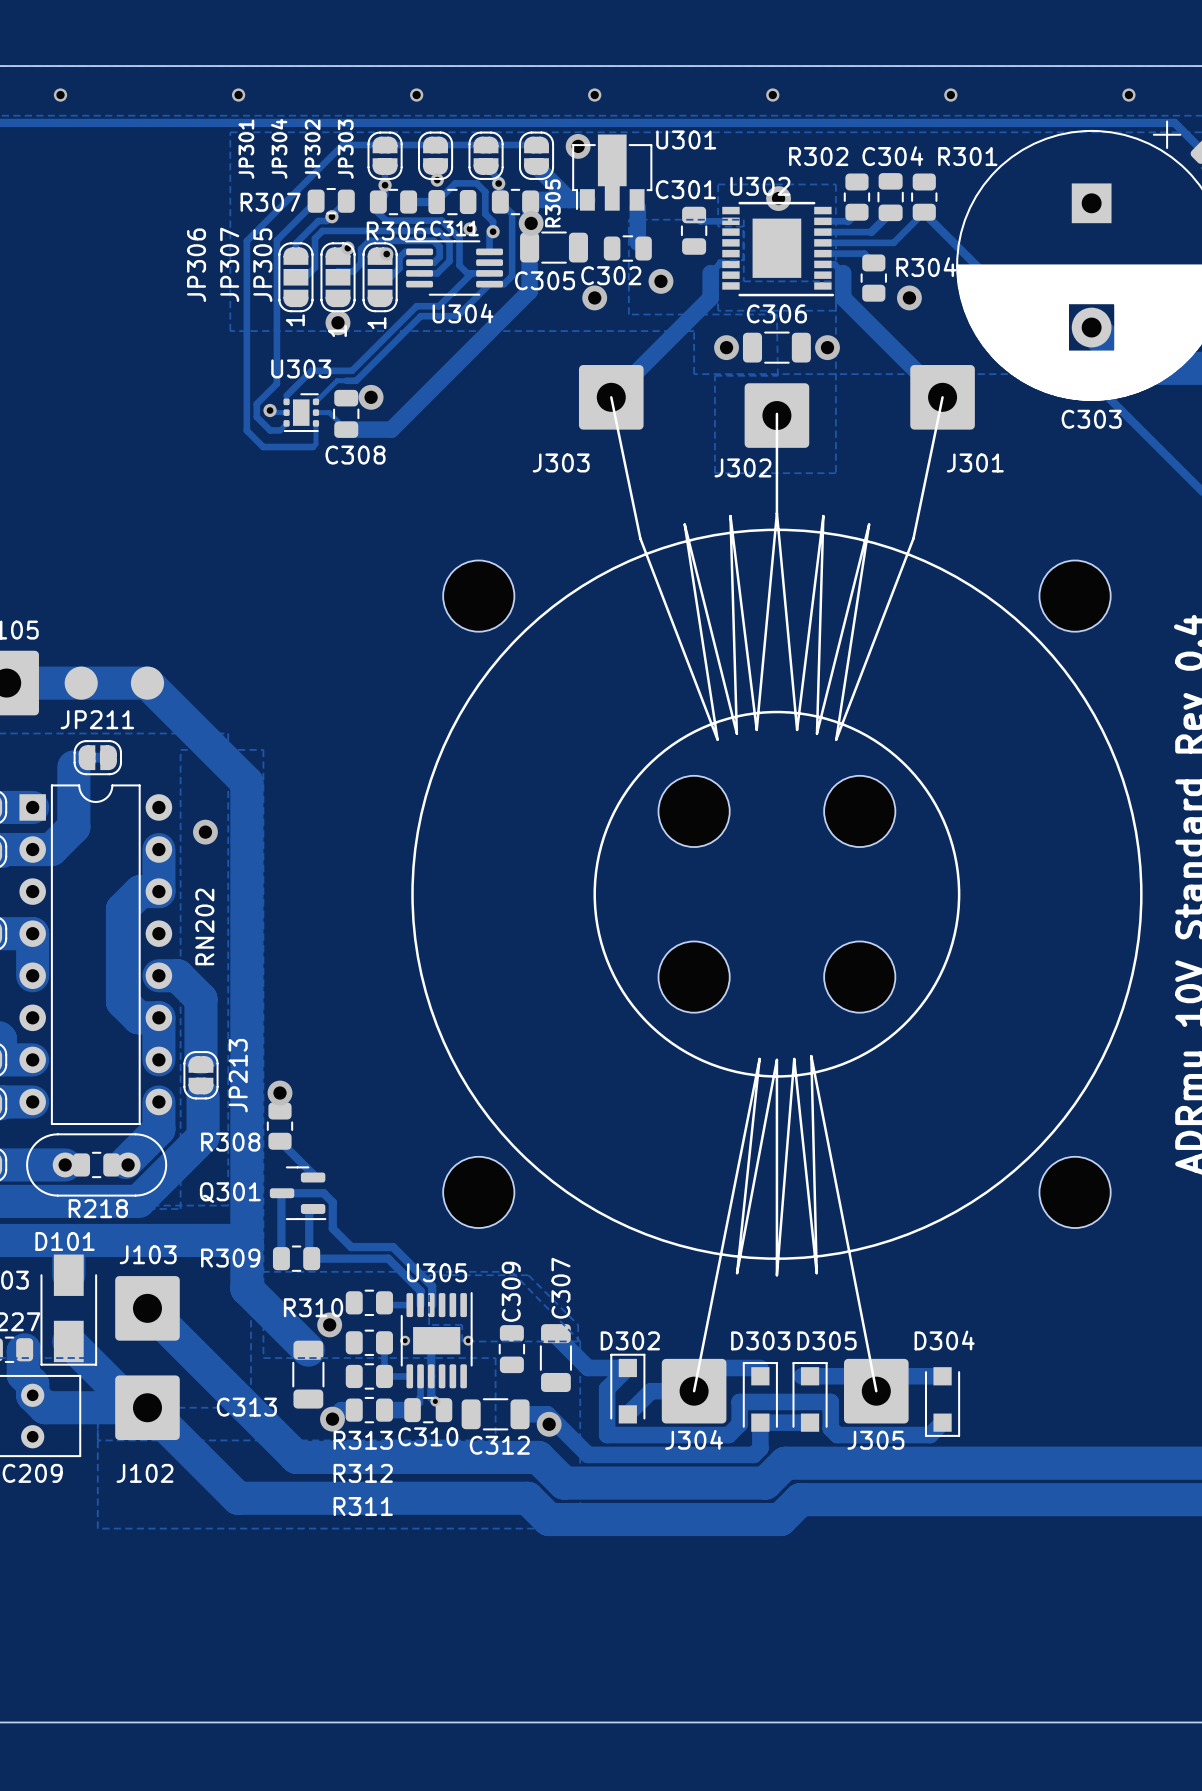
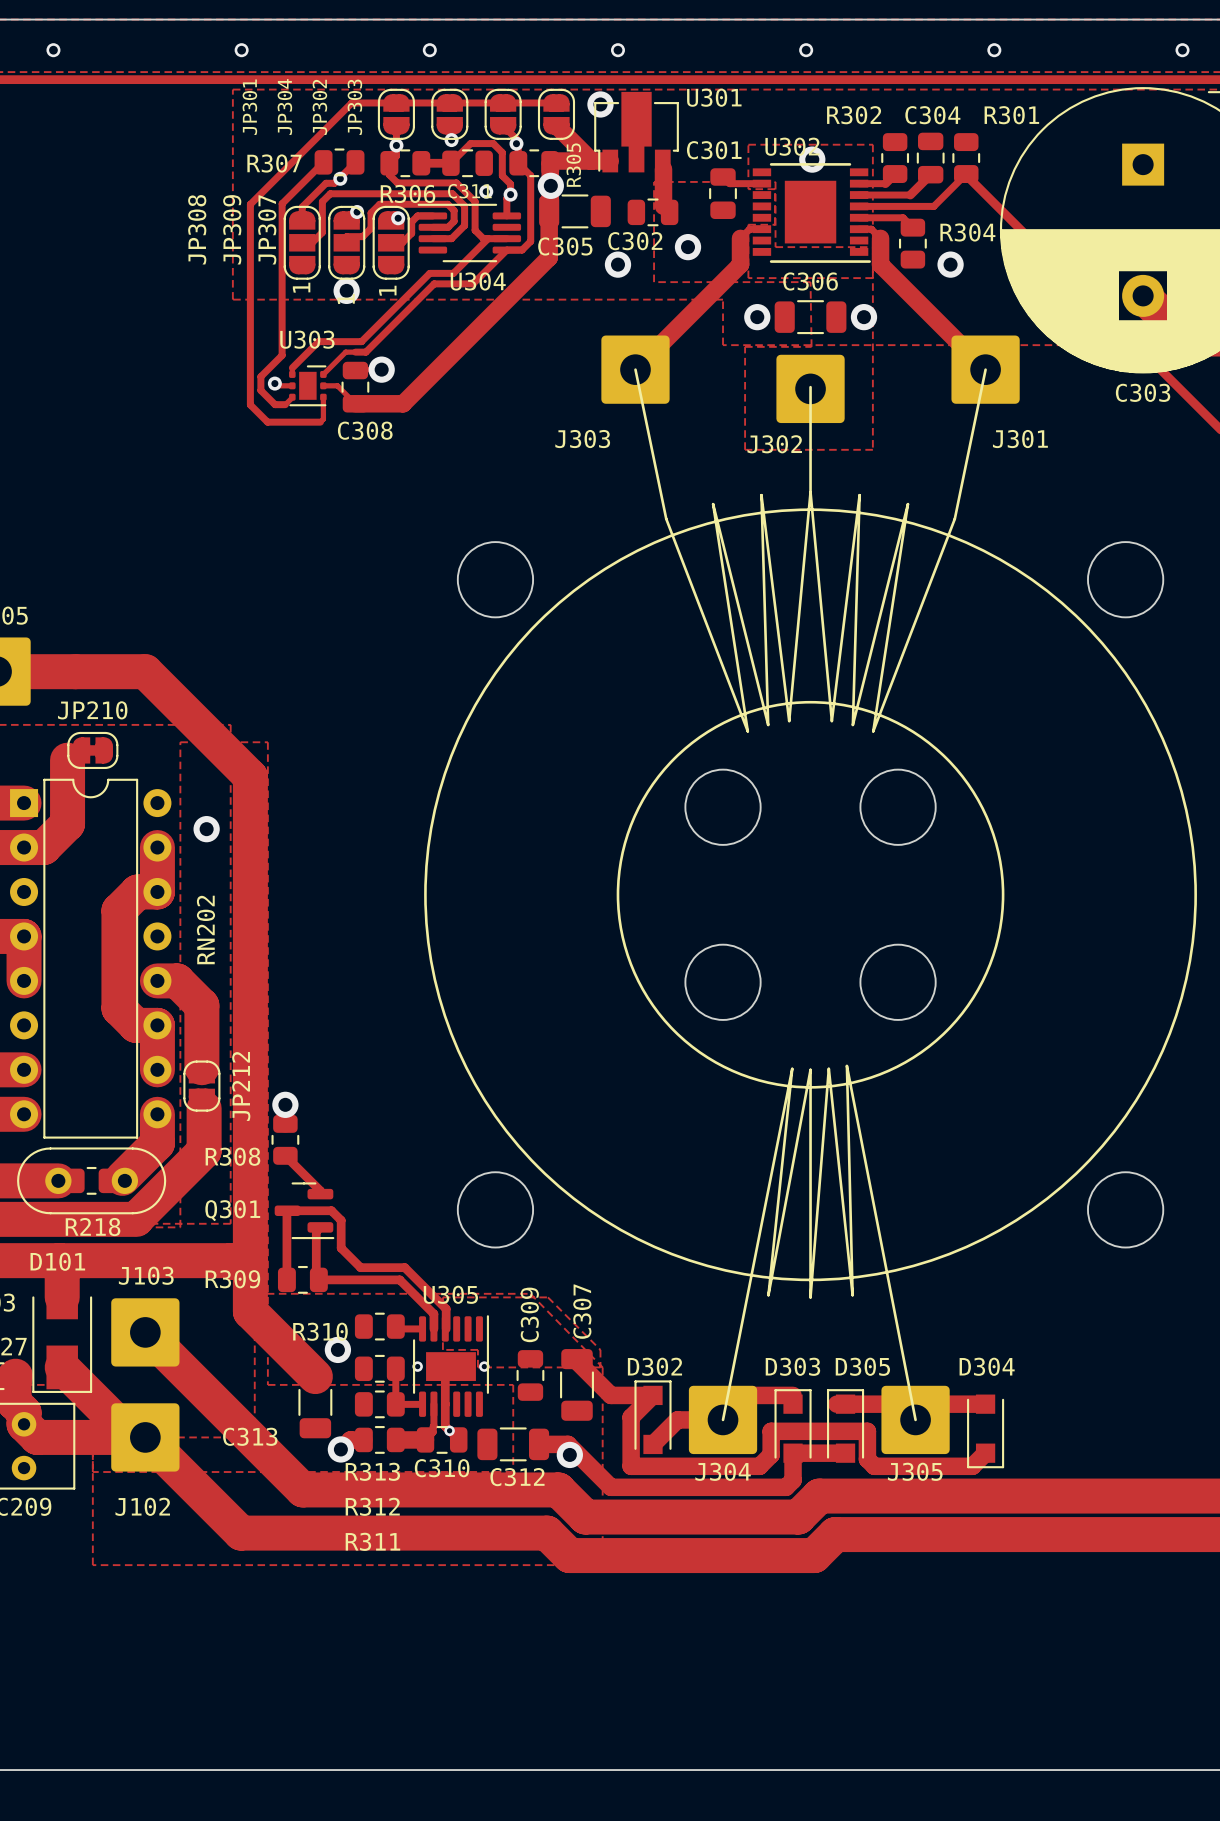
JP307 name: JP307 (229, 264) -> JP309 (232, 229)
JP306 name: JP306 (196, 265) -> JP308 (197, 229)
JP305 name: JP305 (262, 265) -> JP307 (267, 229)
JP211 name: JP211 (97, 719) -> JP210 (92, 710)
JP213 name: JP213 (238, 1075) -> JP212 (241, 1086)

